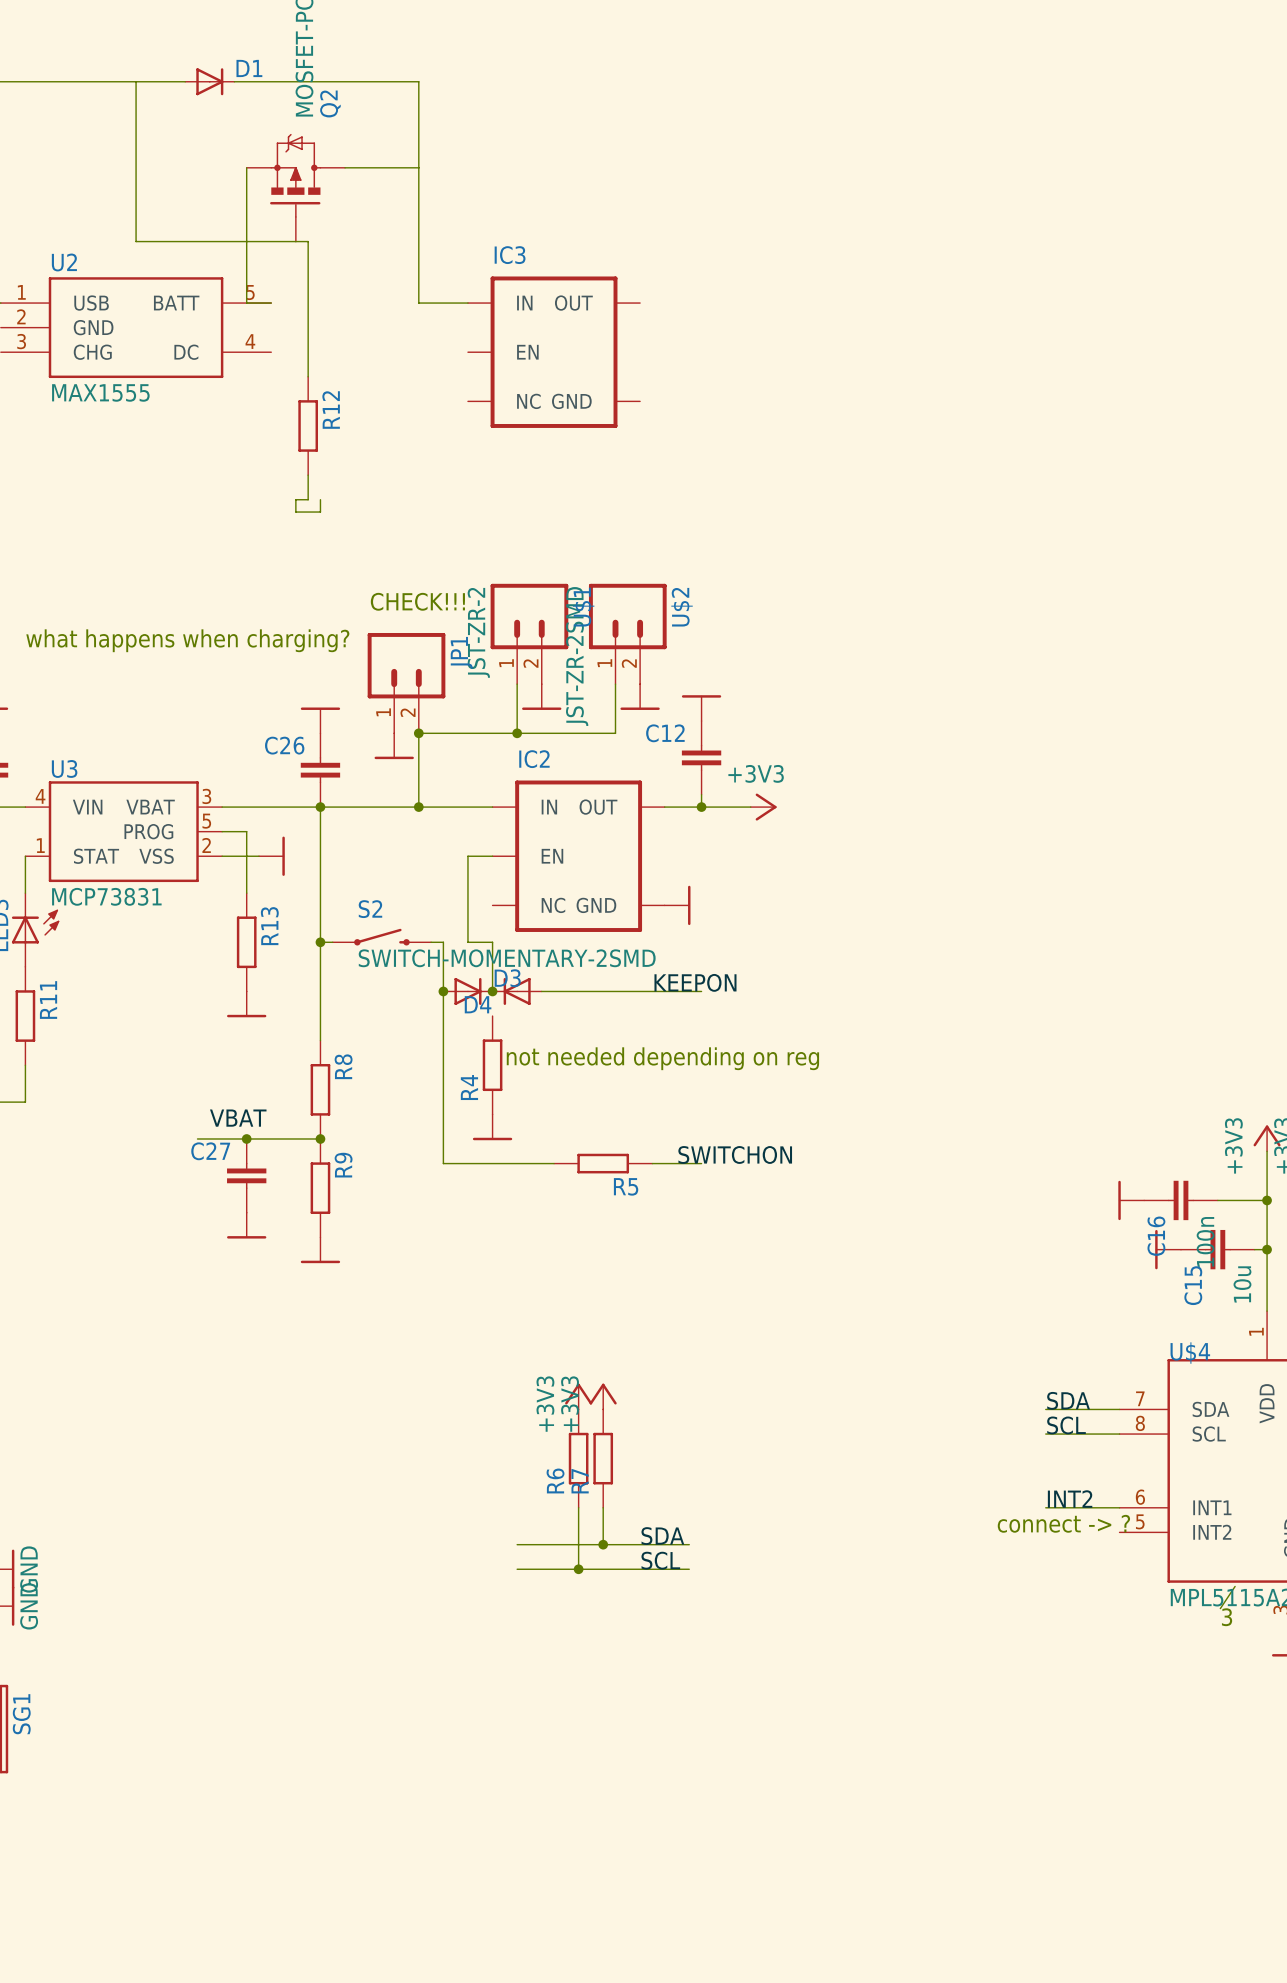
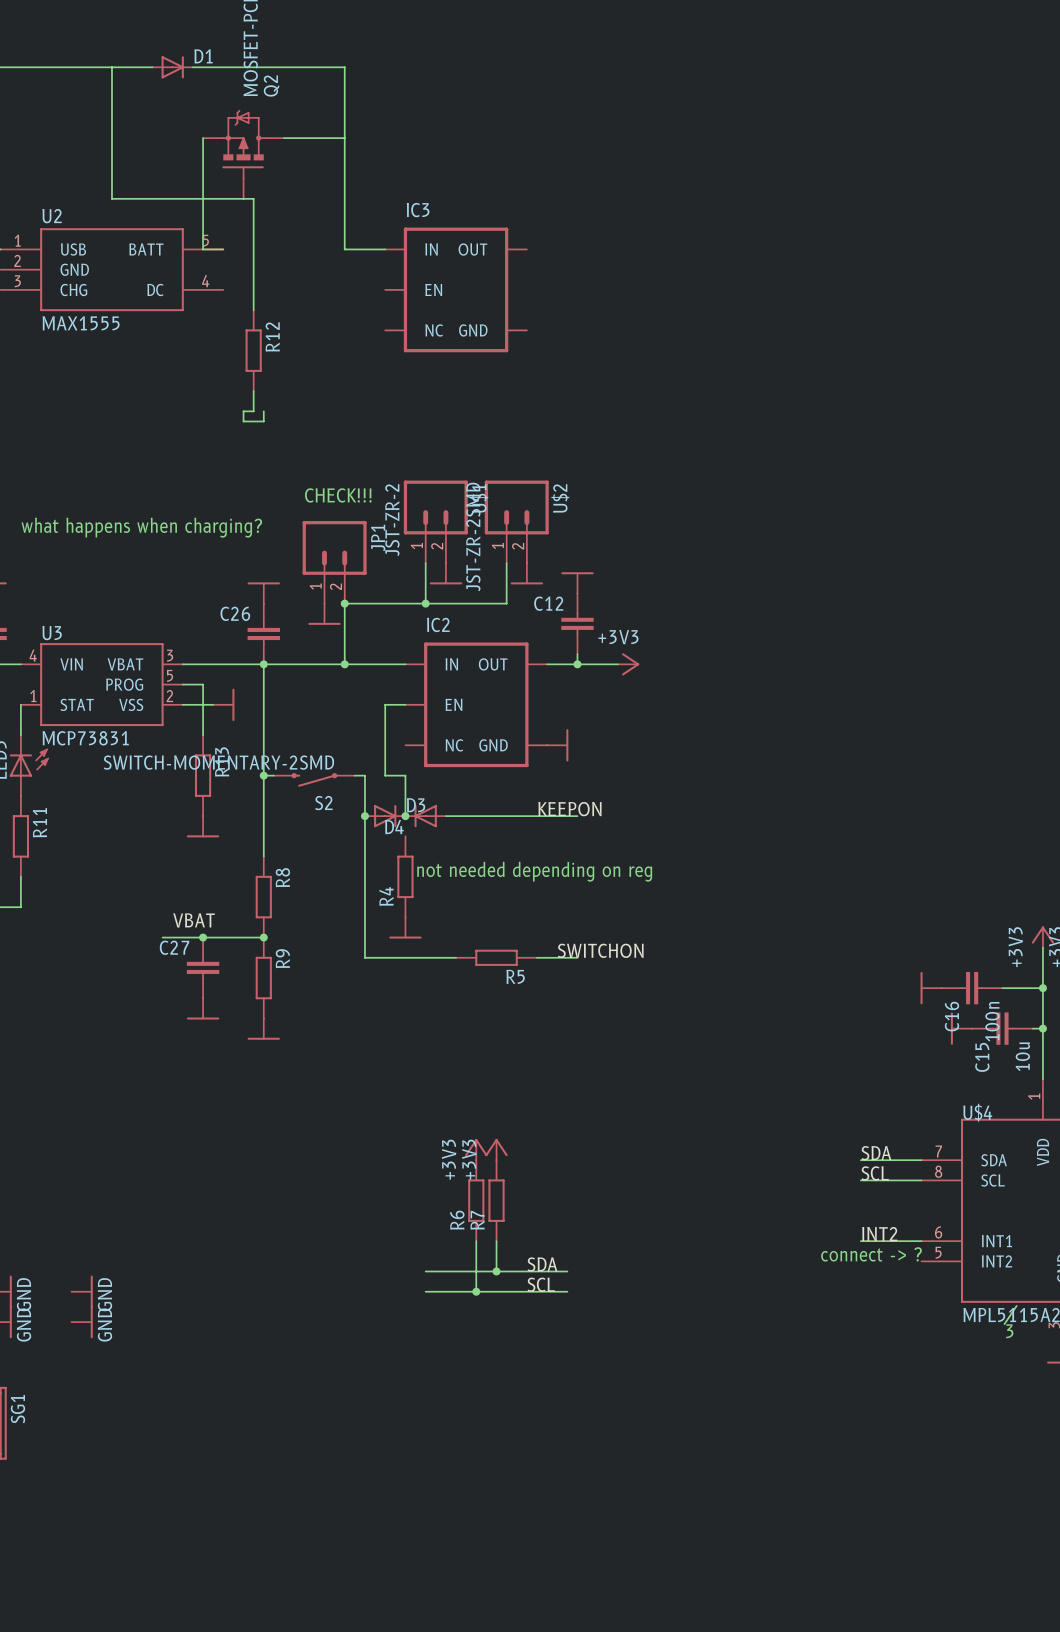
S2 rotation: 0° (381, 937) -> 180° (314, 779)
power symbol: none -> GND (82, 1291)
power symbol: none -> GND (82, 1322)

